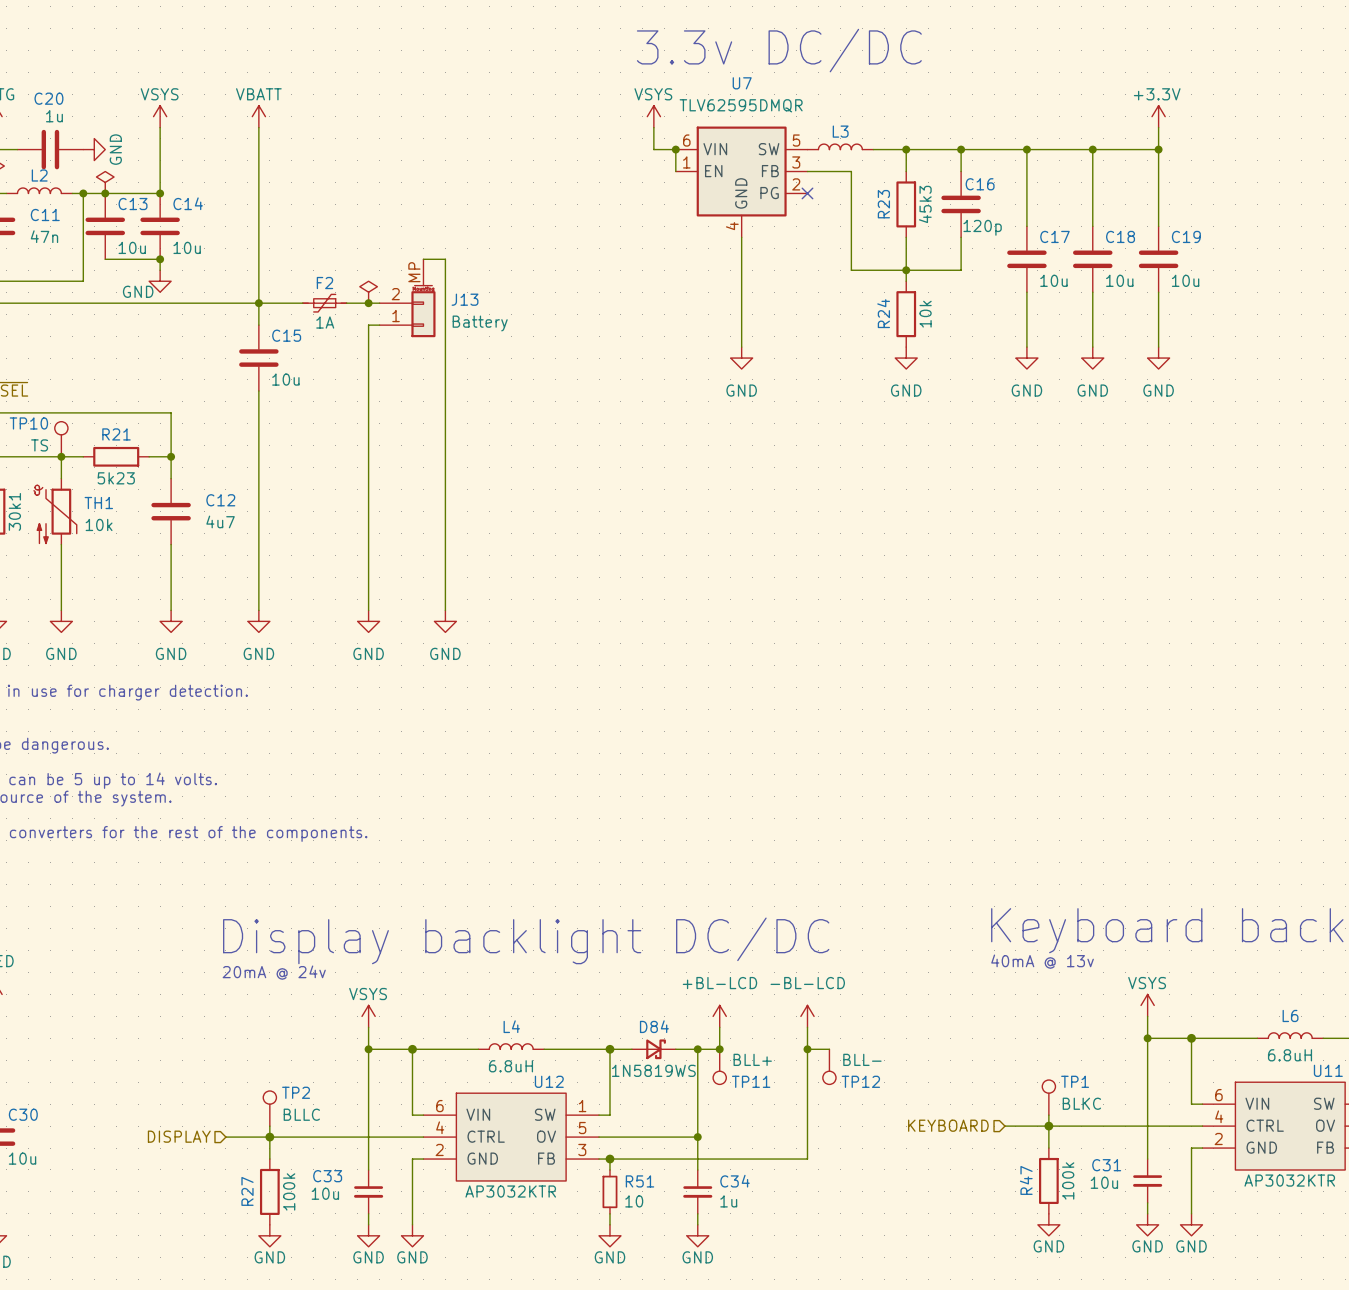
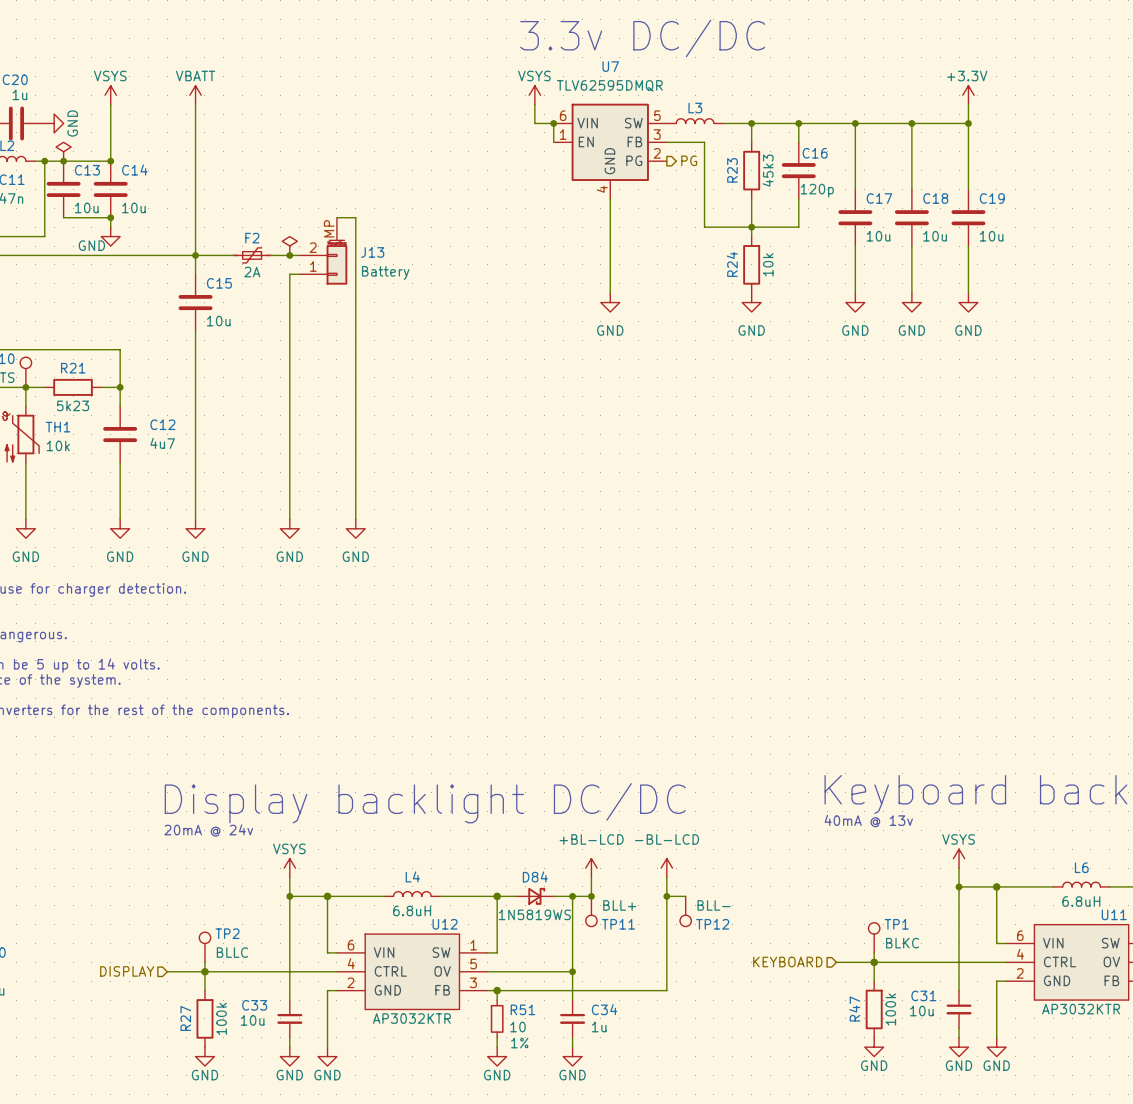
no-connect mark: (807, 193) -> none
hierarchical label: none -> PG (689, 160)
F2 value: 1A (325, 322) -> 2A (252, 272)
R51 text: none -> 1% (519, 1043)

